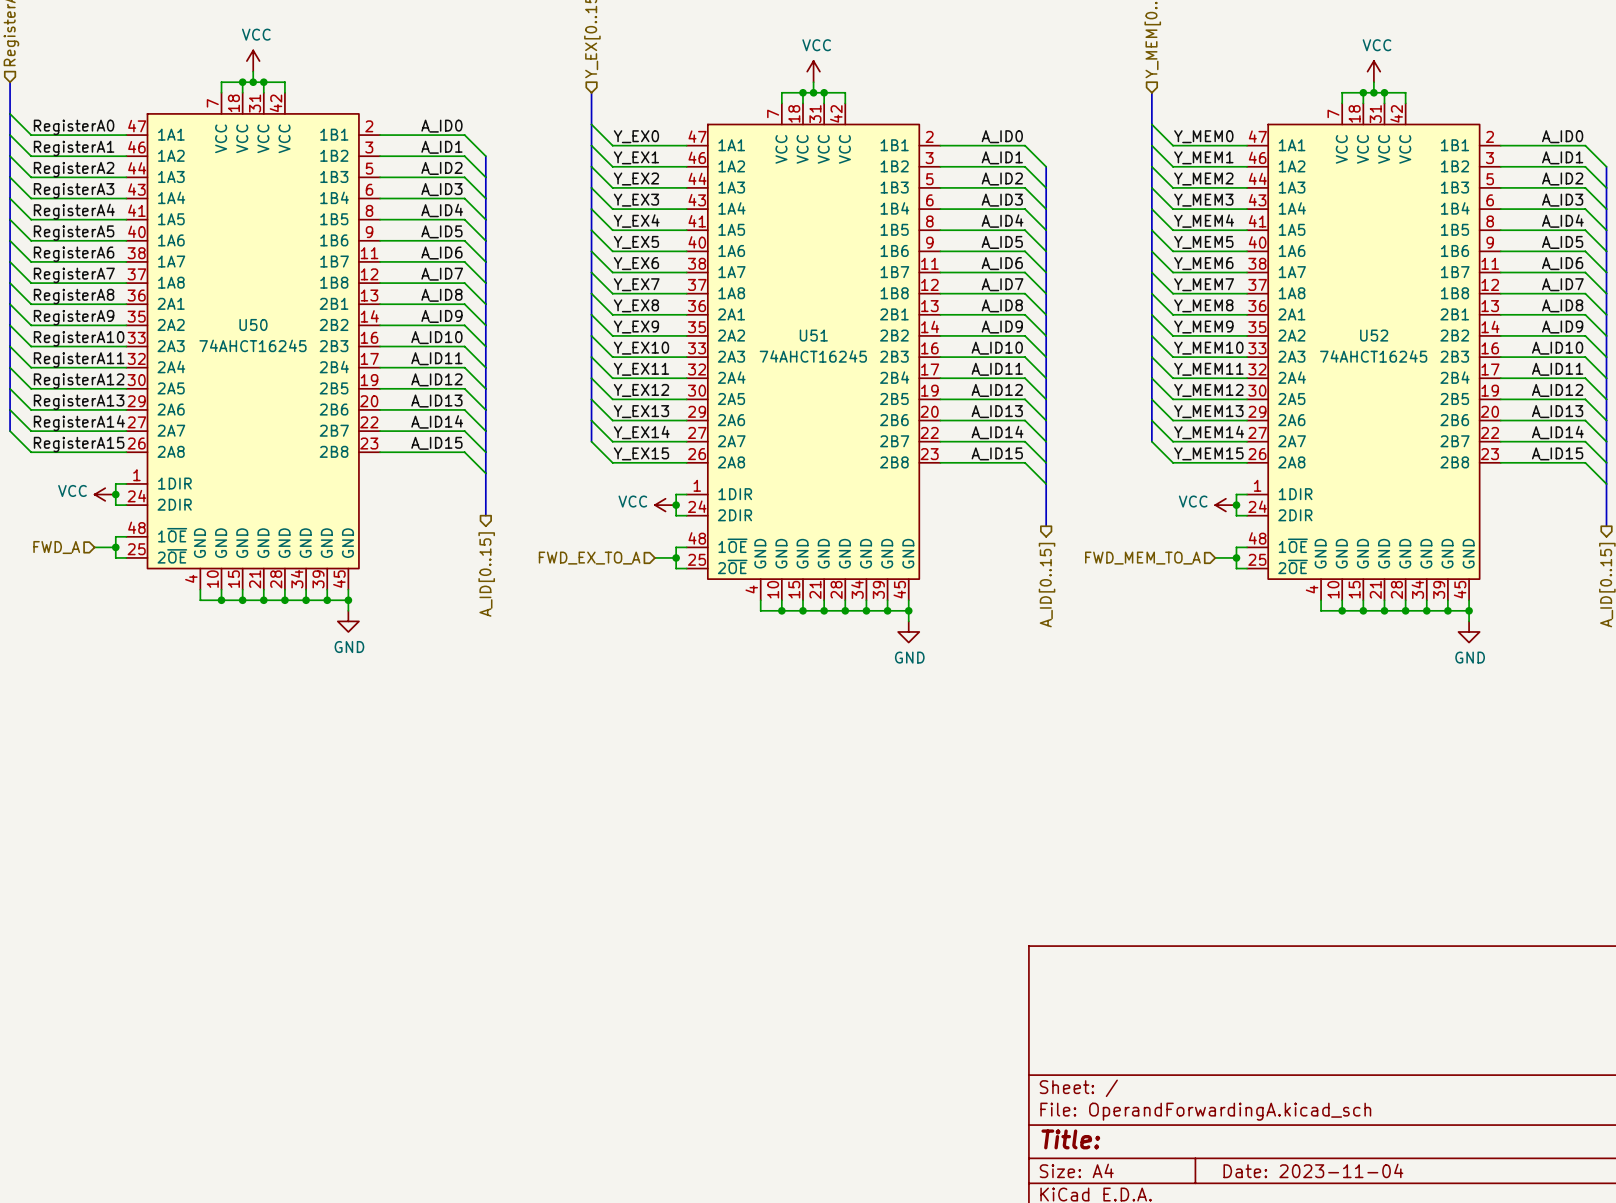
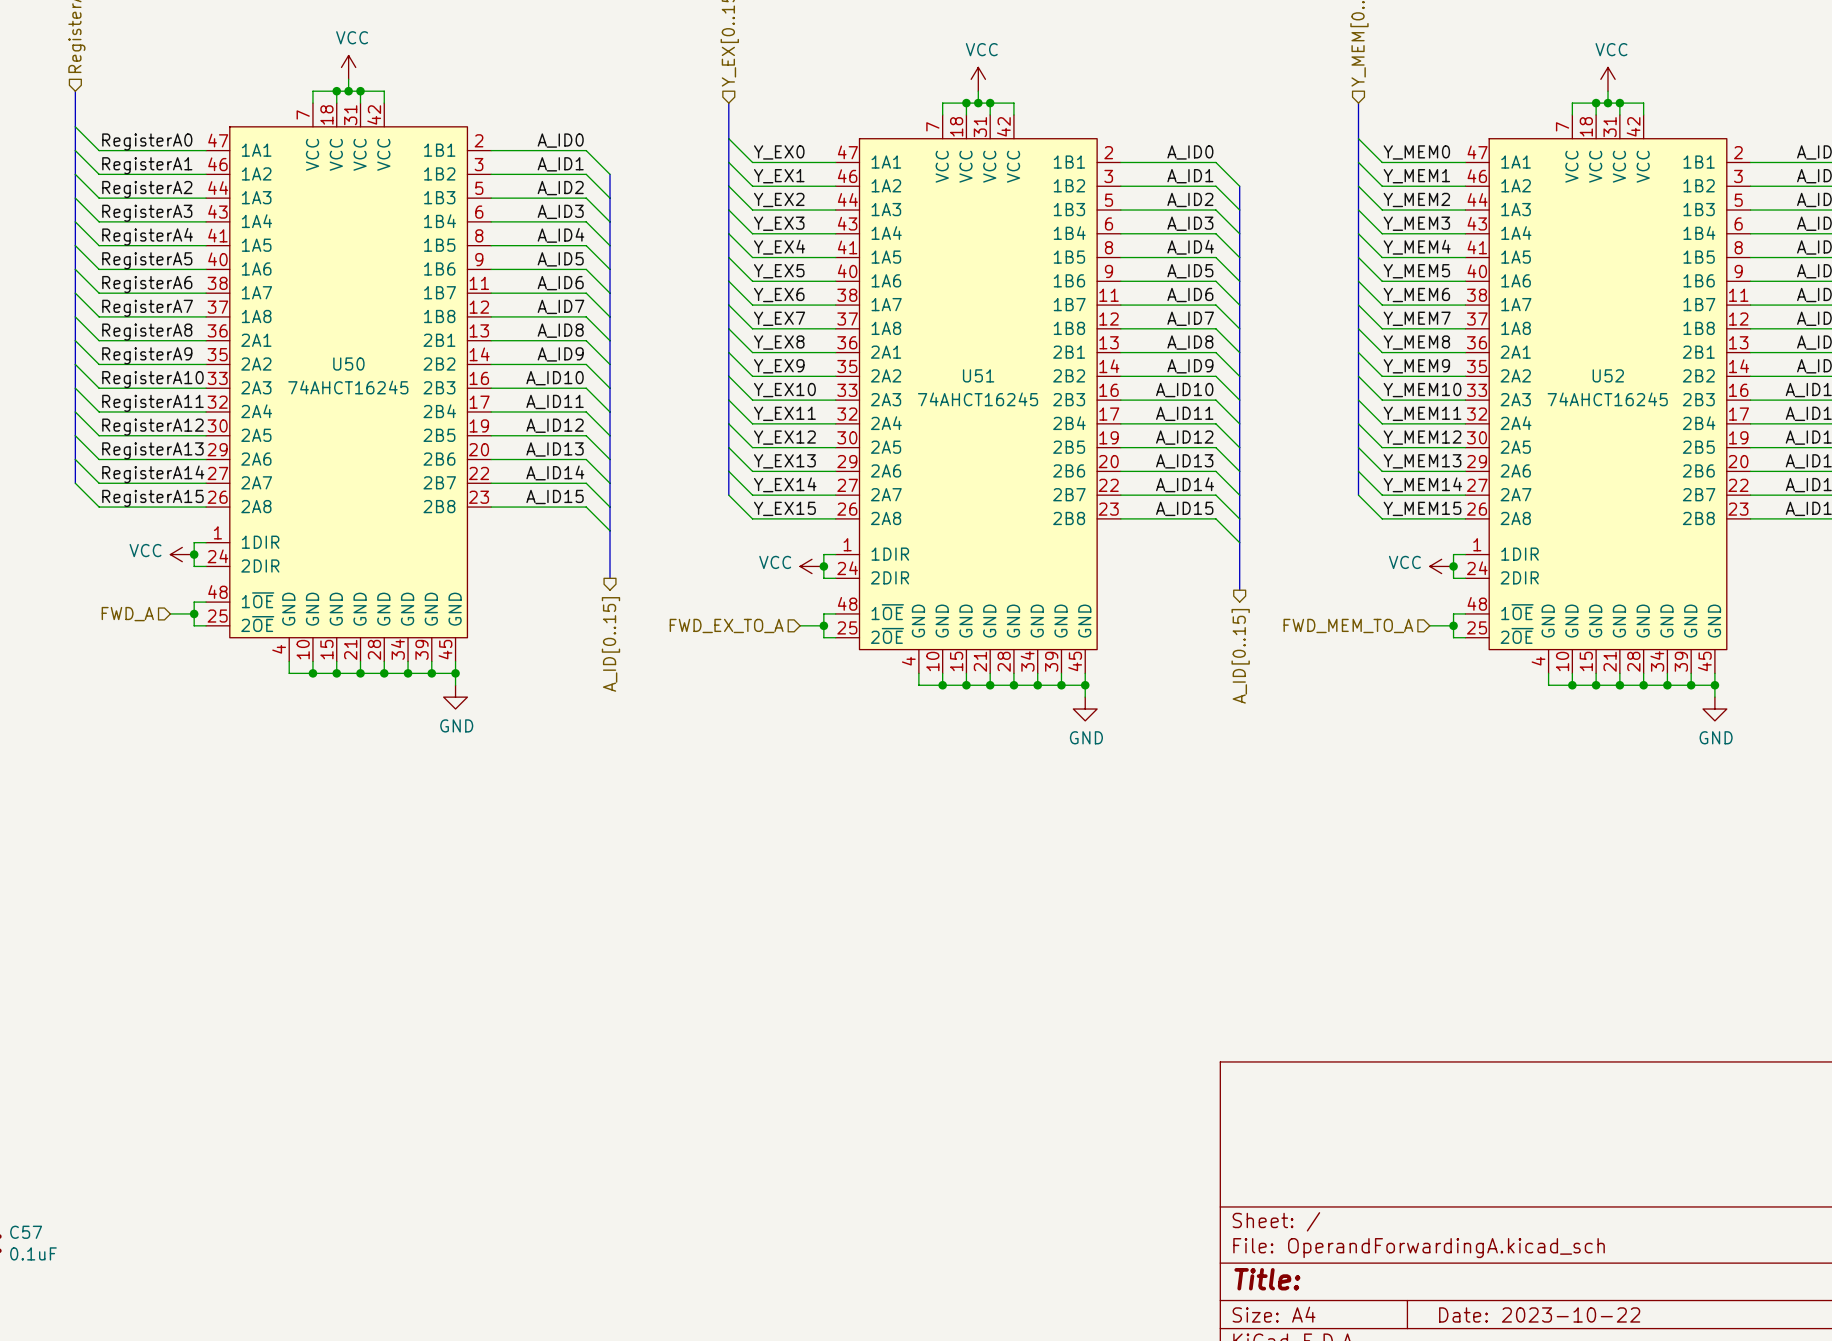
title block: Date: 2023-11-04 (1313, 1170) -> Date: 2023-10-22 (1539, 1314)

